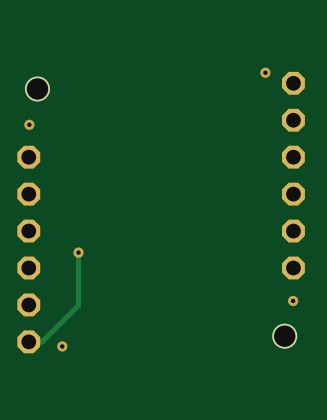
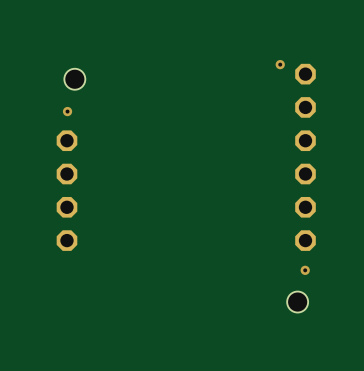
part: (28, 249) -> none
track: (78, 252) (78, 305) (42, 341) (28, 341) -> none
via: (78, 252) -> none
via: (62, 346) -> none

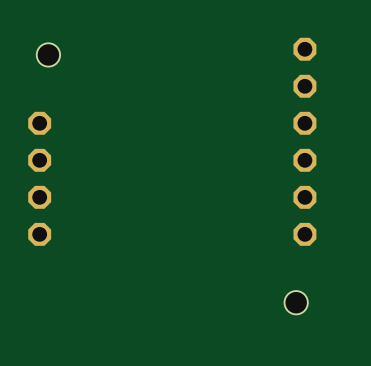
via: (280, 64) -> none
via: (67, 111) -> none
via: (305, 270) -> none

